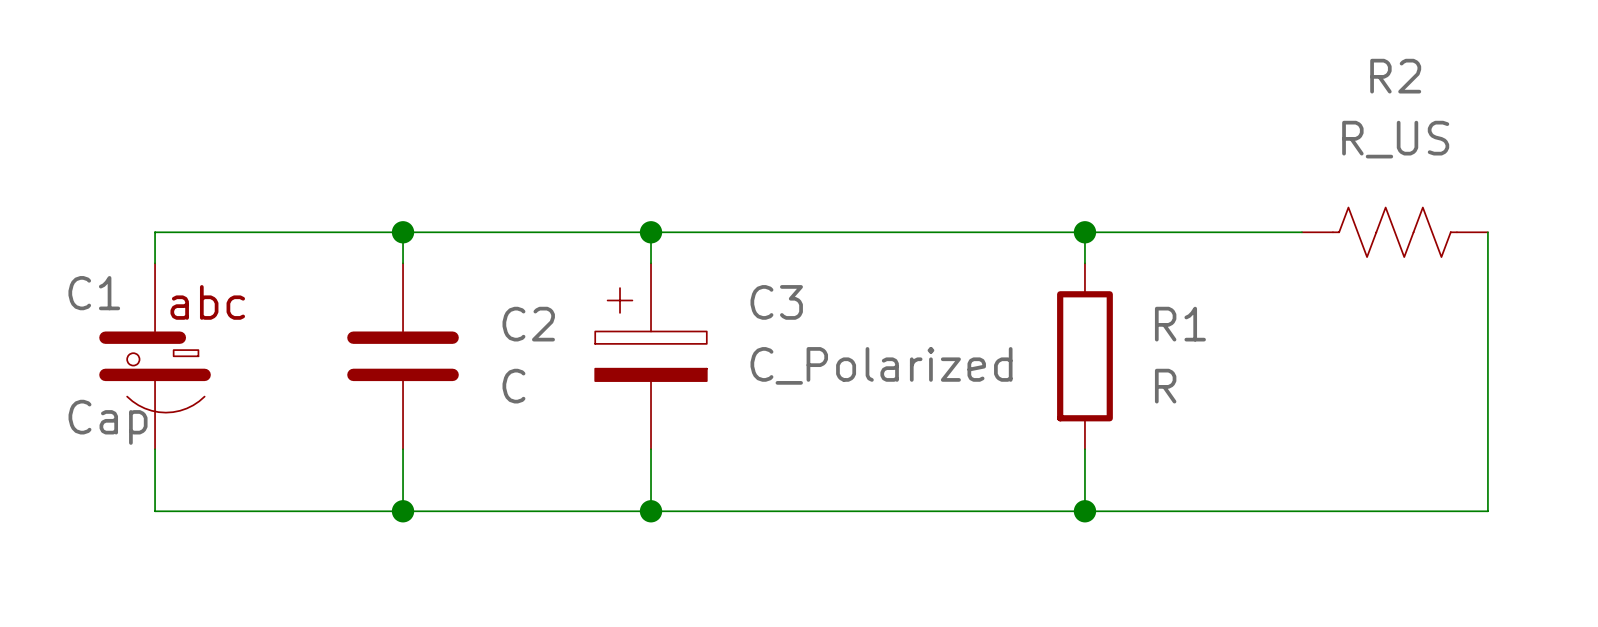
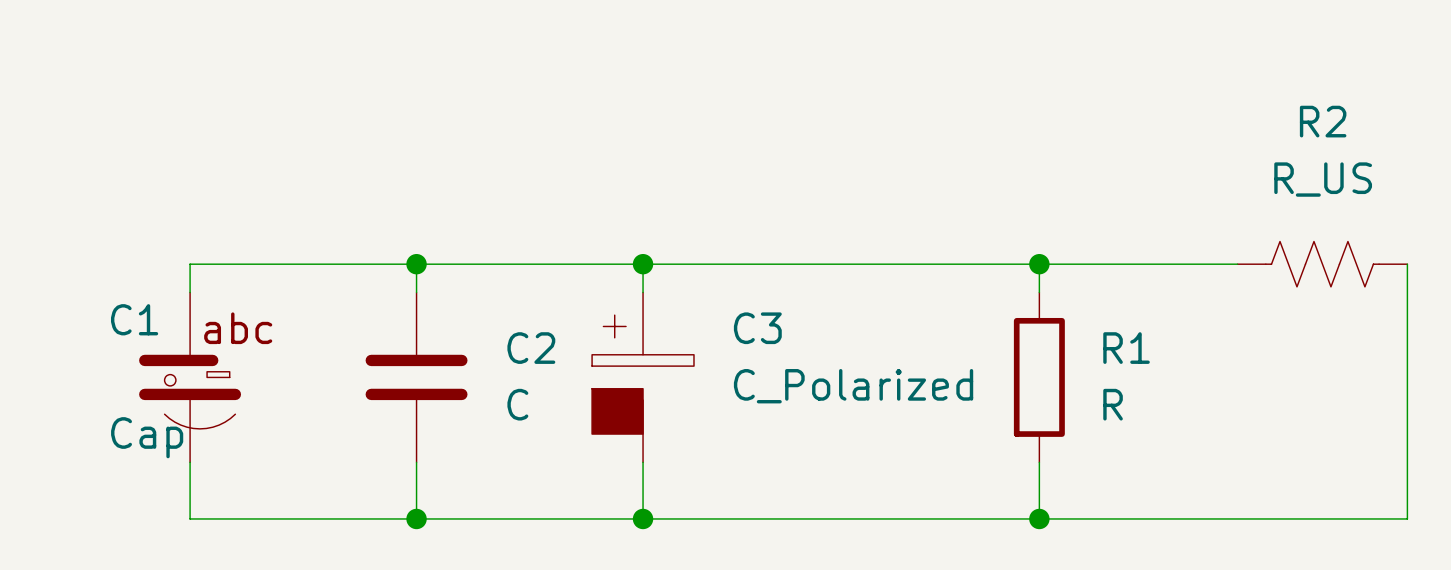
C3 symbol: [595, 263, 707, 450] -> [592, 292, 694, 463]

